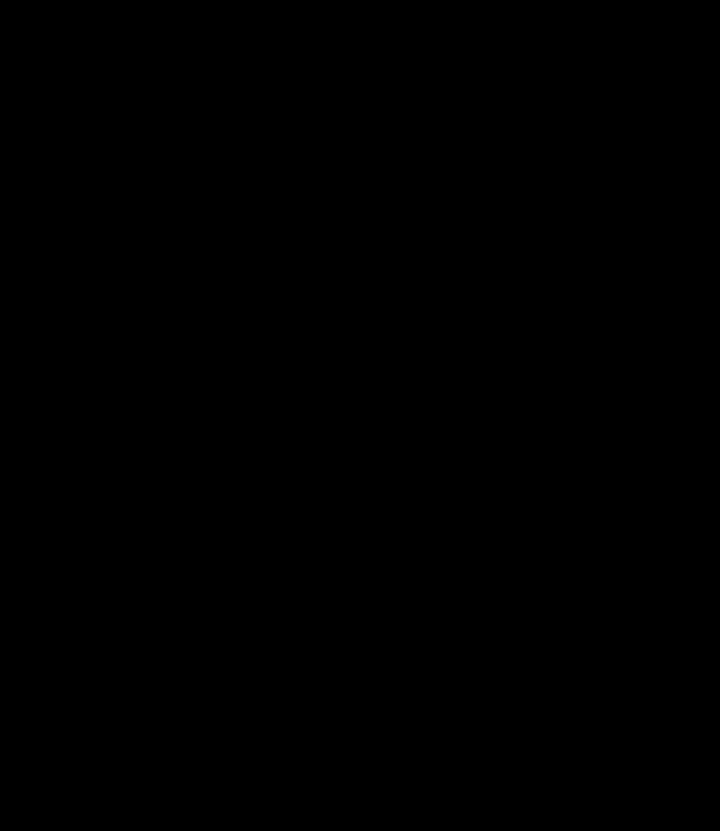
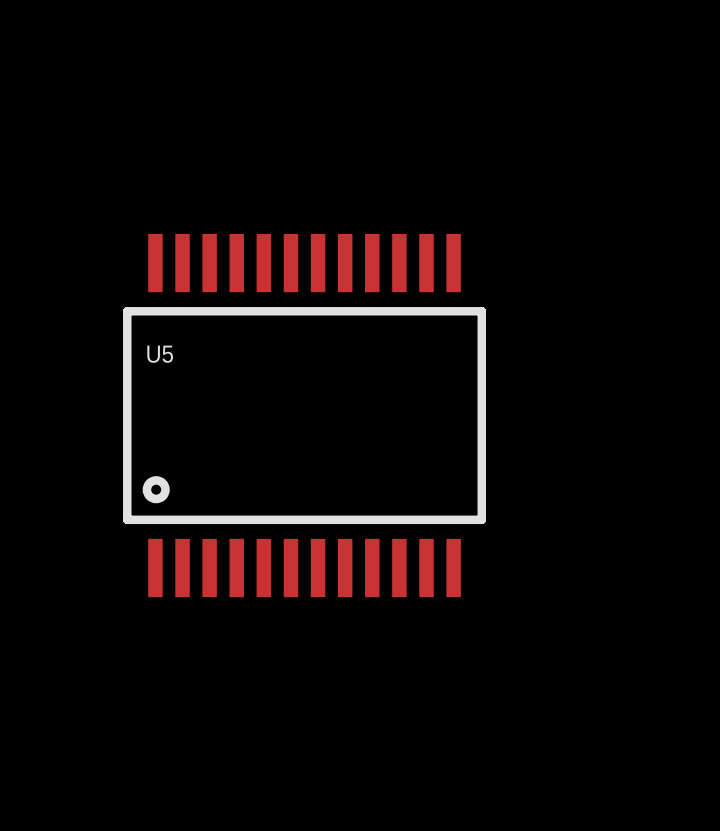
U5: none -> (304, 415)

